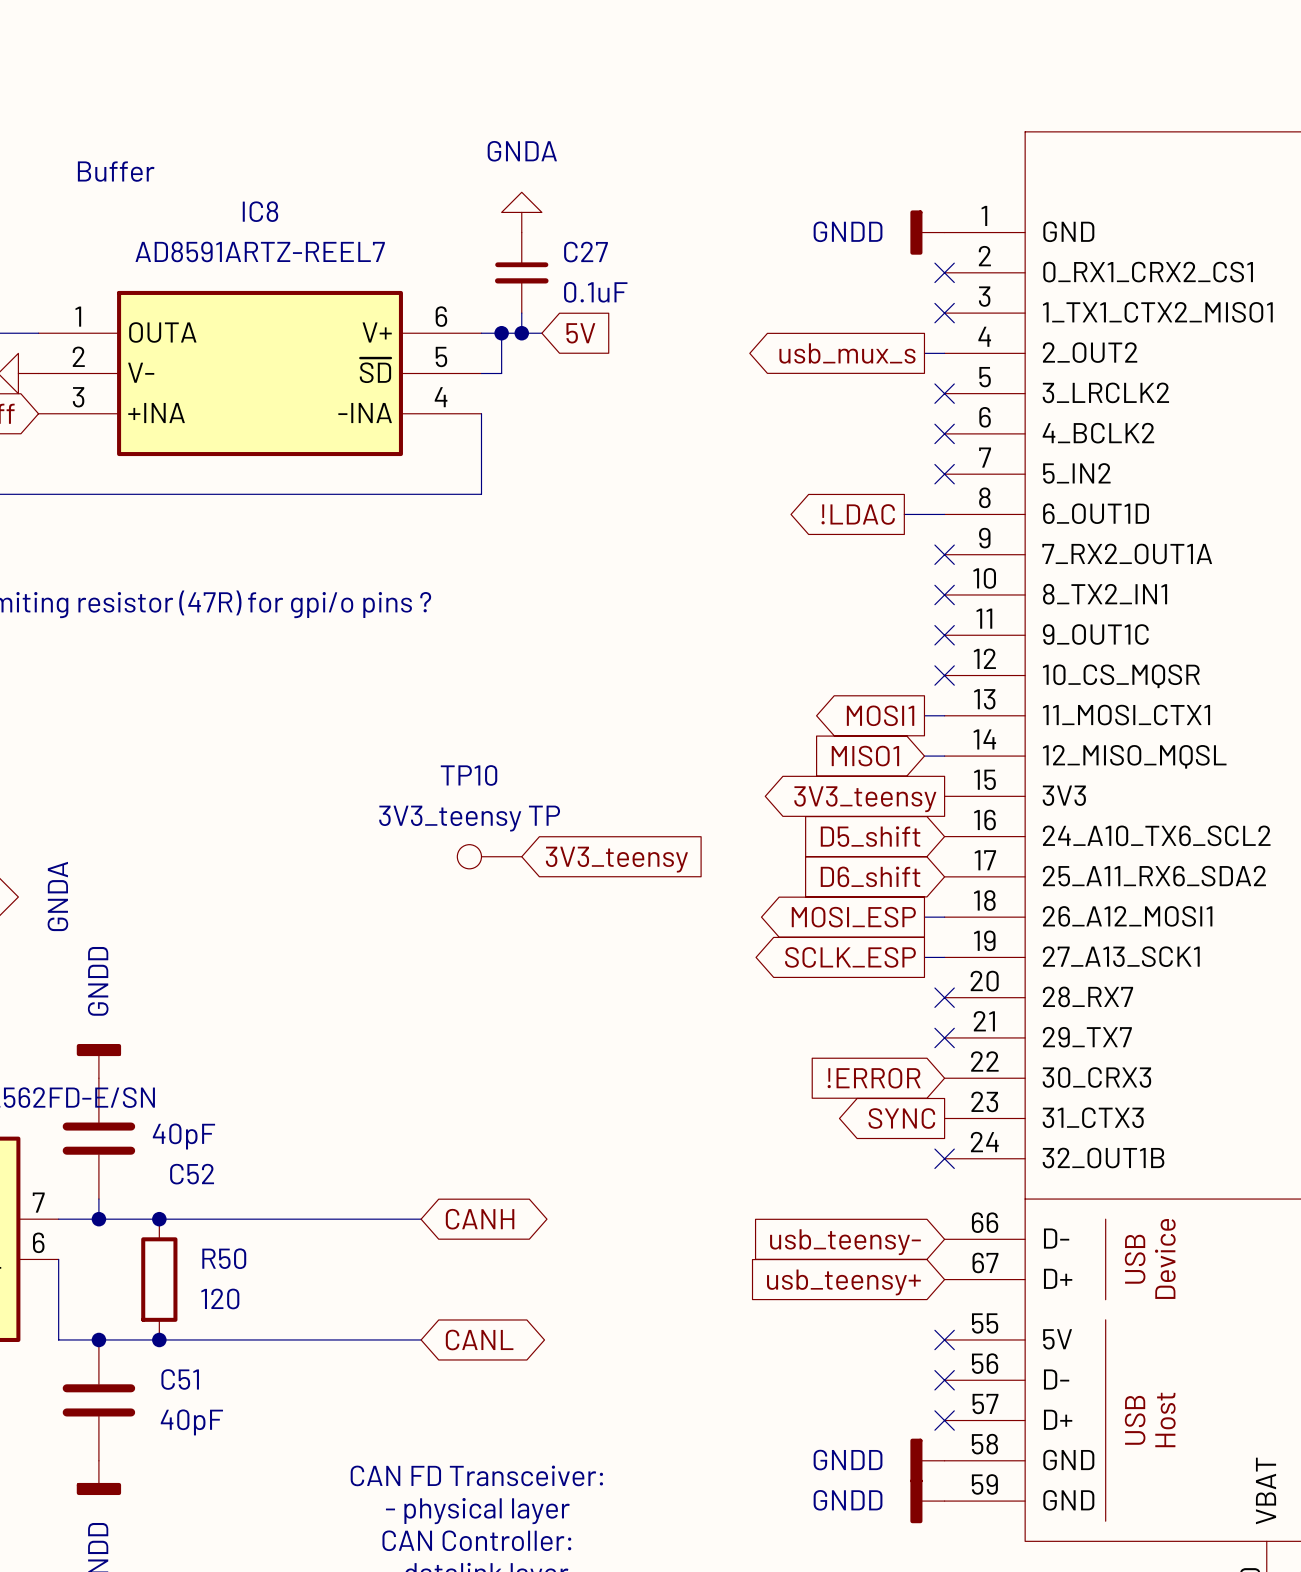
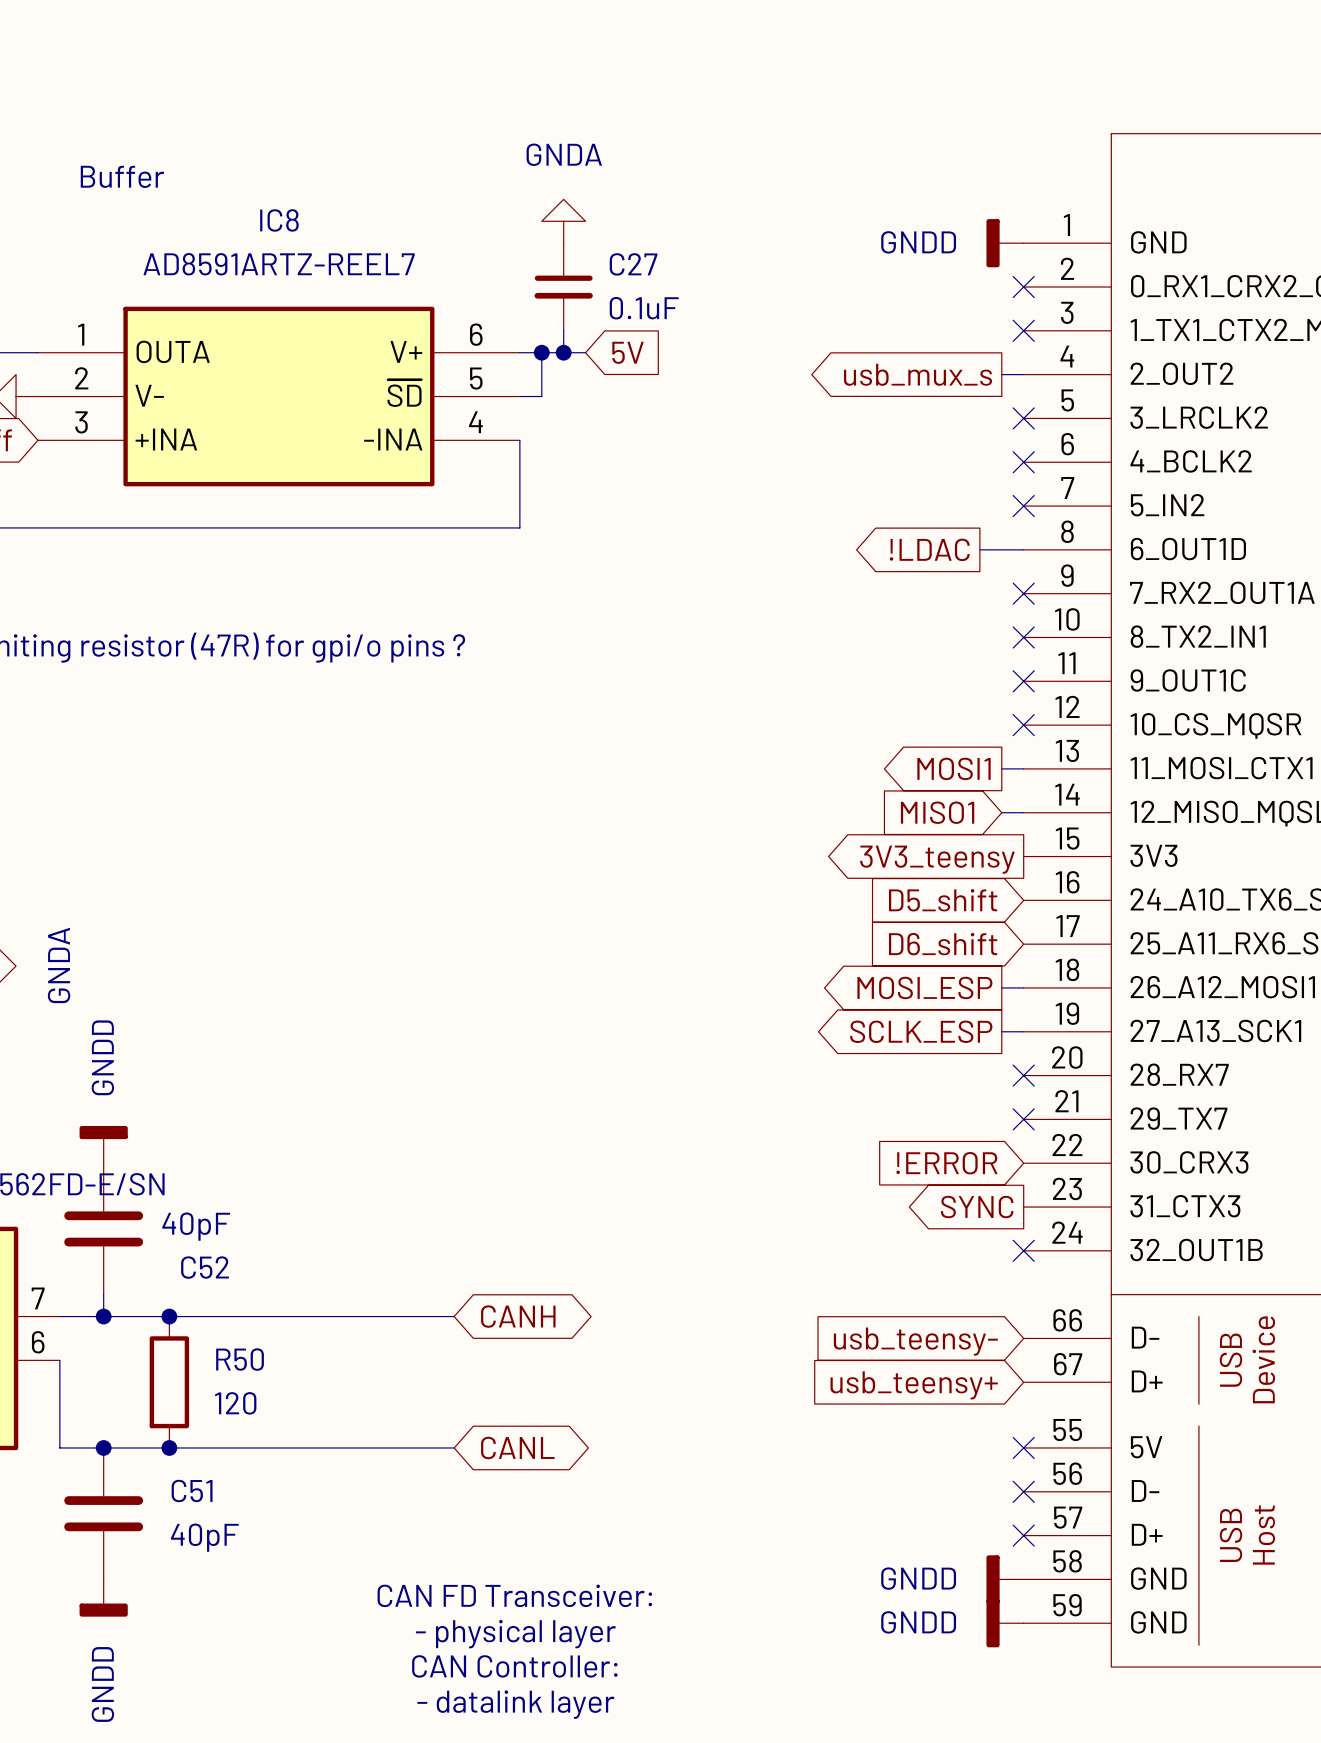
TP10: 3V3_teensy TP (489, 856) -> none
global label: 3V3_teensy (616, 859) -> none

